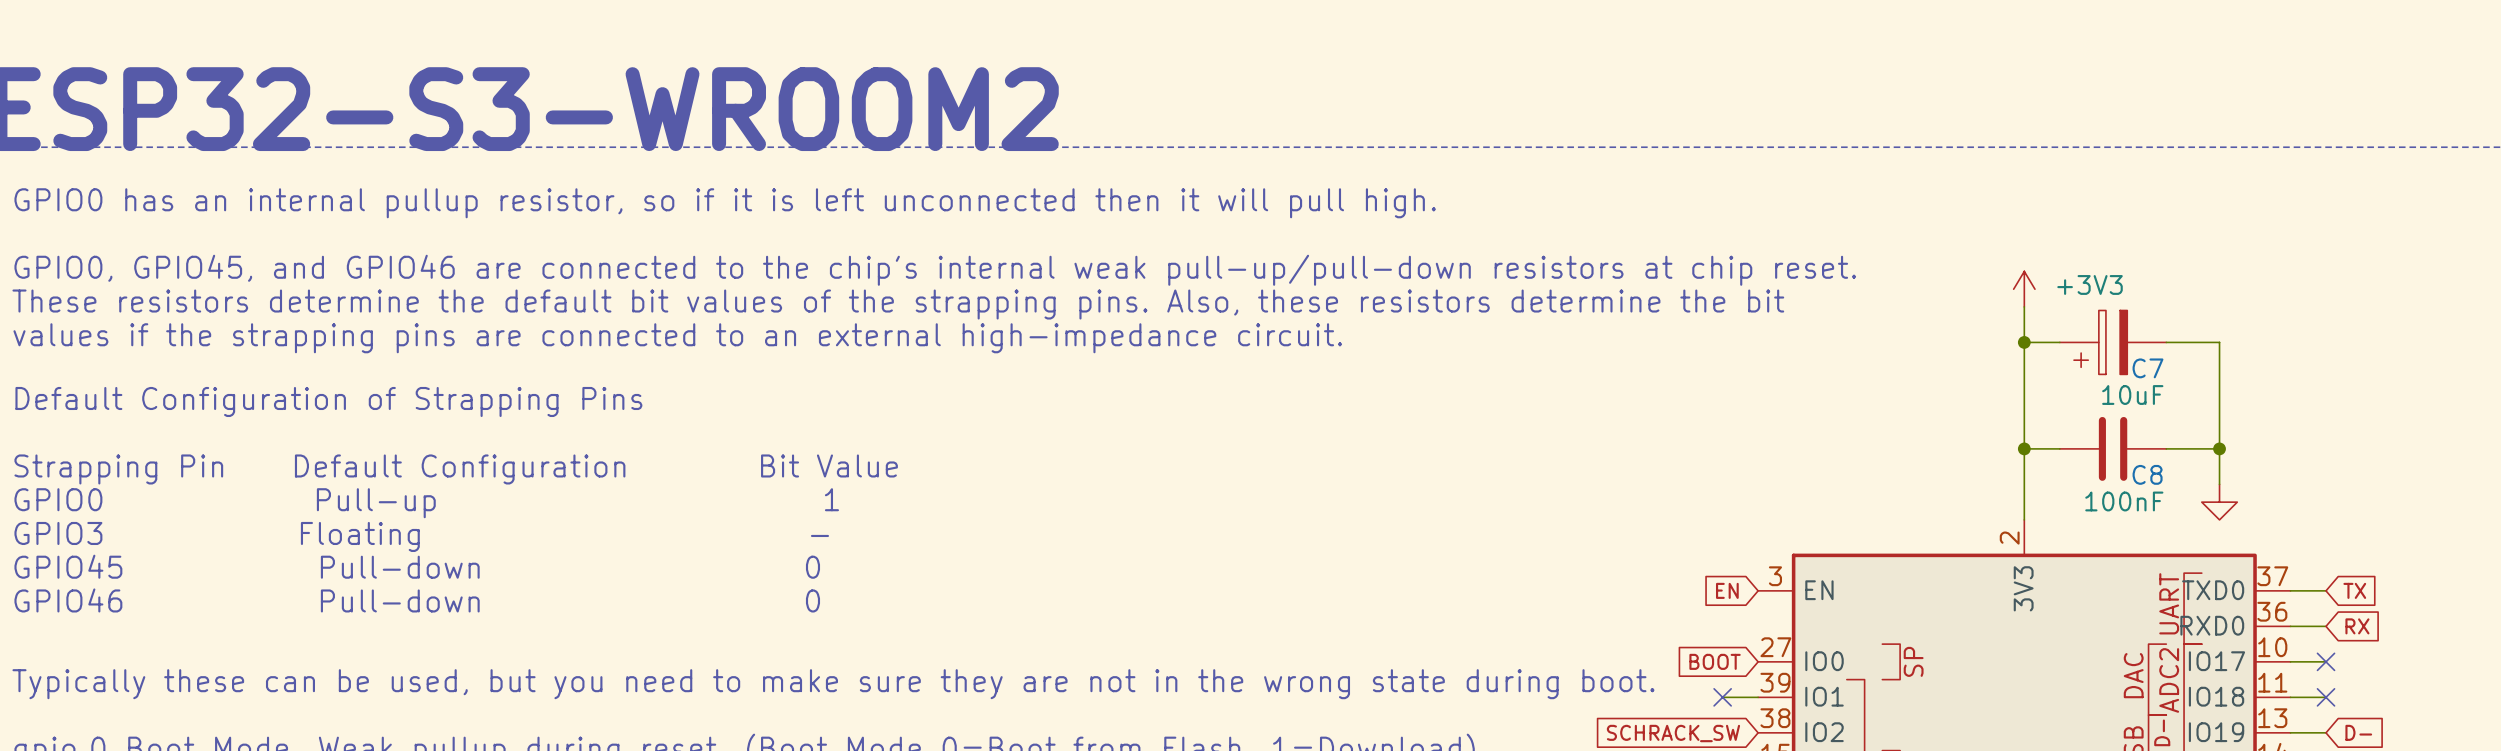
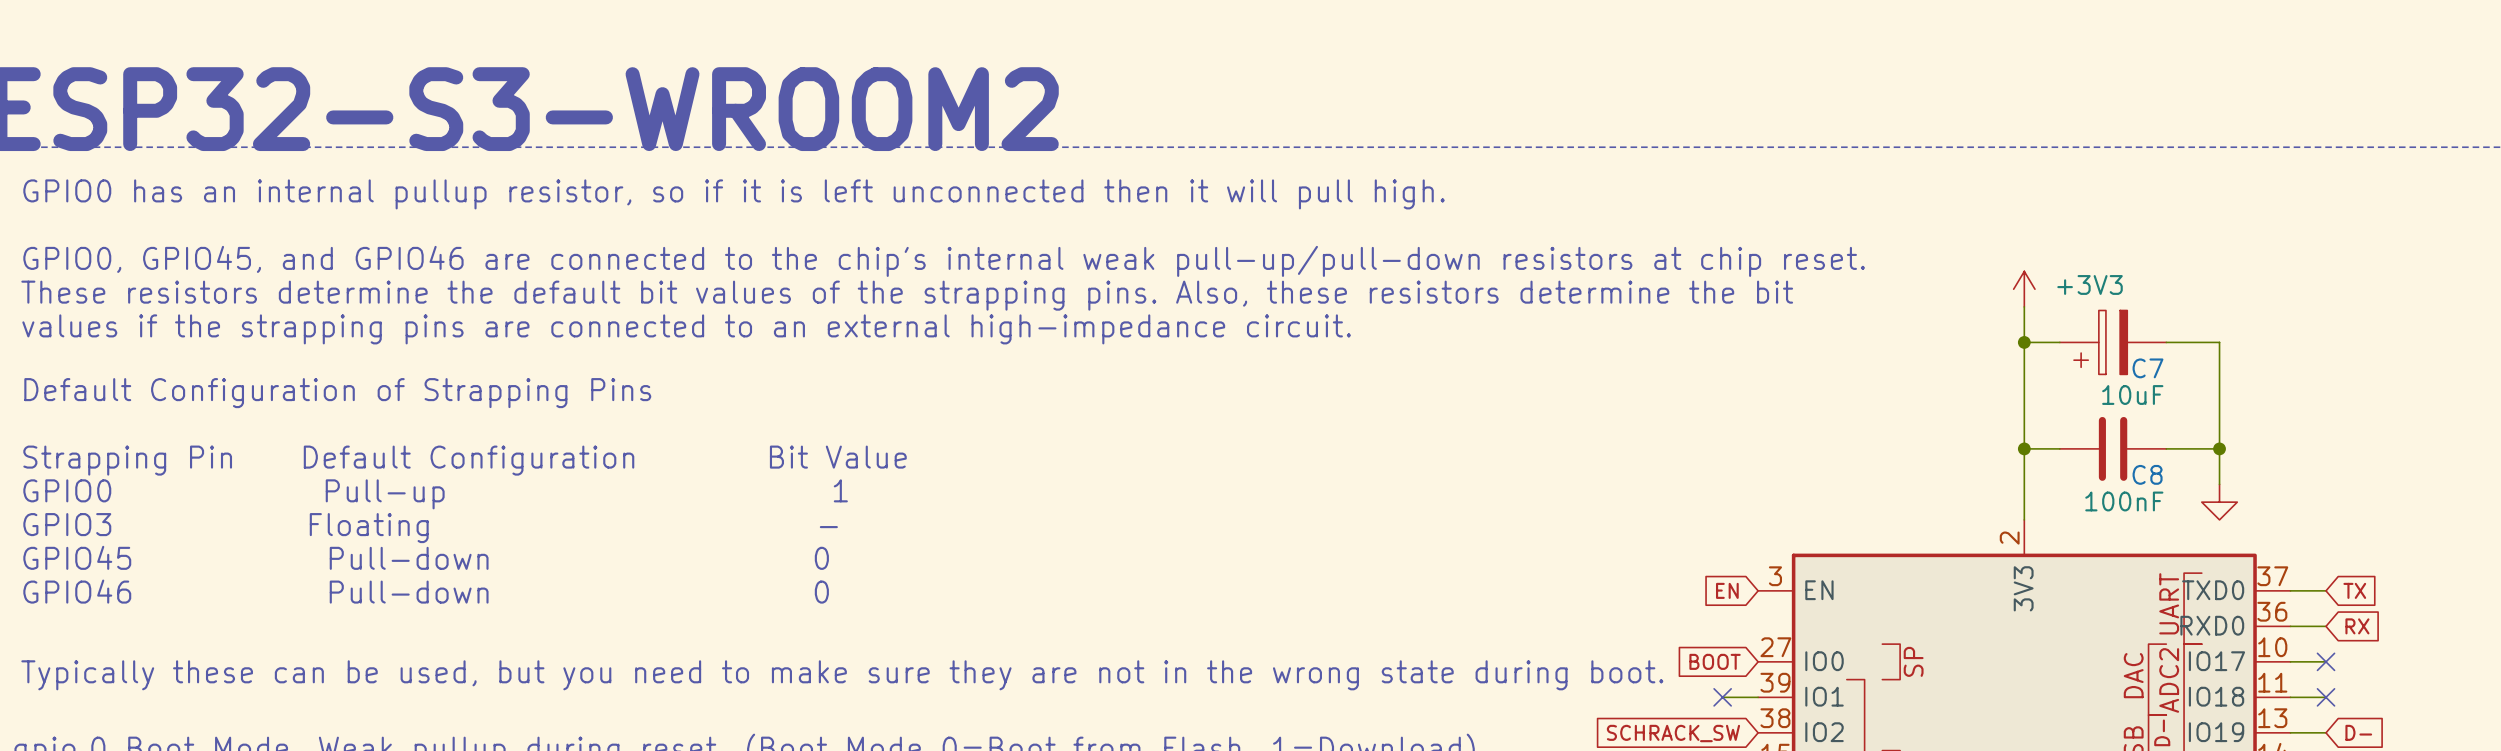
text position: GPIO0 has an internal pullup resistor, so if it is left unconnected then it will pull high. (725, 203) -> GPIO0 has an internal pullup resistor, so if it is left unconnected then it will pull high. (734, 194)
text position: GPIO0, GPIO45, and GPIO46 are connected to the chip's internal weak pull-up/pull-down resistors at chip reset. (935, 270) -> GPIO0, GPIO45, and GPIO46 are connected to the chip's internal weak pull-up/pull-down resistors at chip reset. (944, 261)
text position: These resistors determine the default bit values of the strapping pins. Also, these resistors determine the bit (898, 304) -> These resistors determine the default bit values of the strapping pins. Also, these resistors determine the bit (907, 295)
text position: values if the strapping pins are connected to an external high-impedance circuit. (677, 338) -> values if the strapping pins are connected to an external high-impedance circuit. (686, 329)
text position: Default Configuration of Strapping Pins (328, 401) -> Default Configuration of Strapping Pins (337, 393)
text position: Strapping Pin Default Configuration Bit Value (456, 469) -> Strapping Pin Default Configuration Bit Value (465, 460)
text position: GPIO0 Pull-up 1 (426, 503) -> GPIO0 Pull-up 1 (435, 494)
text position: GPIO3 Floating - (421, 536) -> GPIO3 Floating - (430, 528)
text position: GPIO45 Pull-down 0 (417, 566) -> GPIO45 Pull-down 0 (426, 557)
text position: GPIO46 Pull-down 0 (417, 600) -> GPIO46 Pull-down 0 (426, 591)
text position: Typically these can be used, but you need to make sure they are not in the wrong state during boot. (833, 684) -> Typically these can be used, but you need to make sure they are not in the wrong state during boot. (842, 675)

